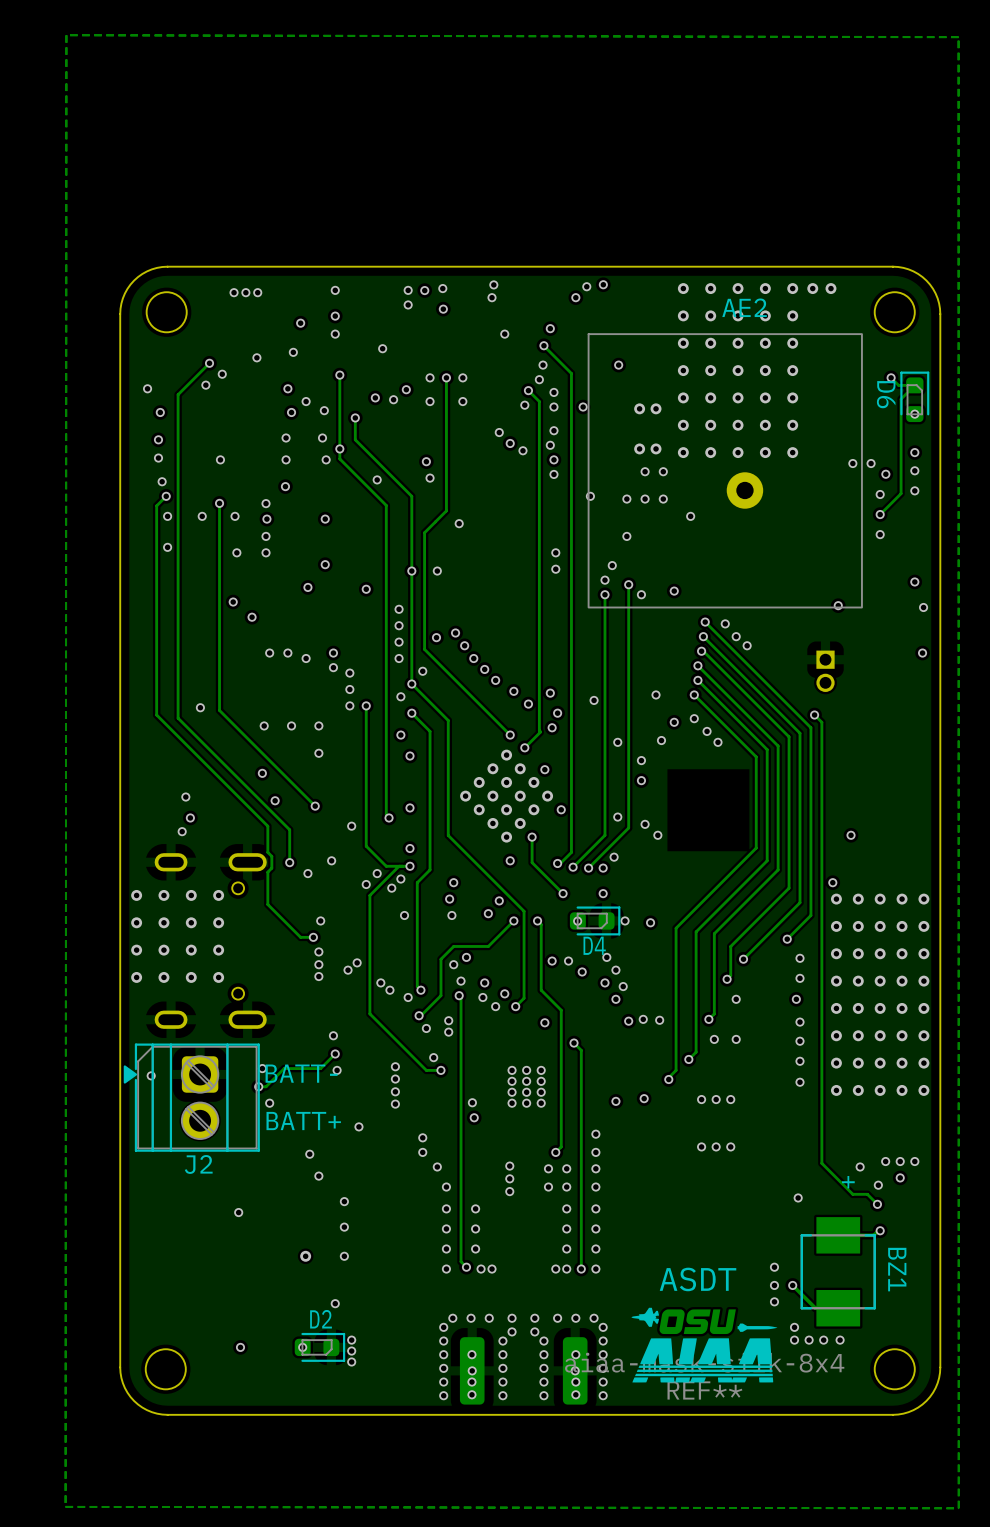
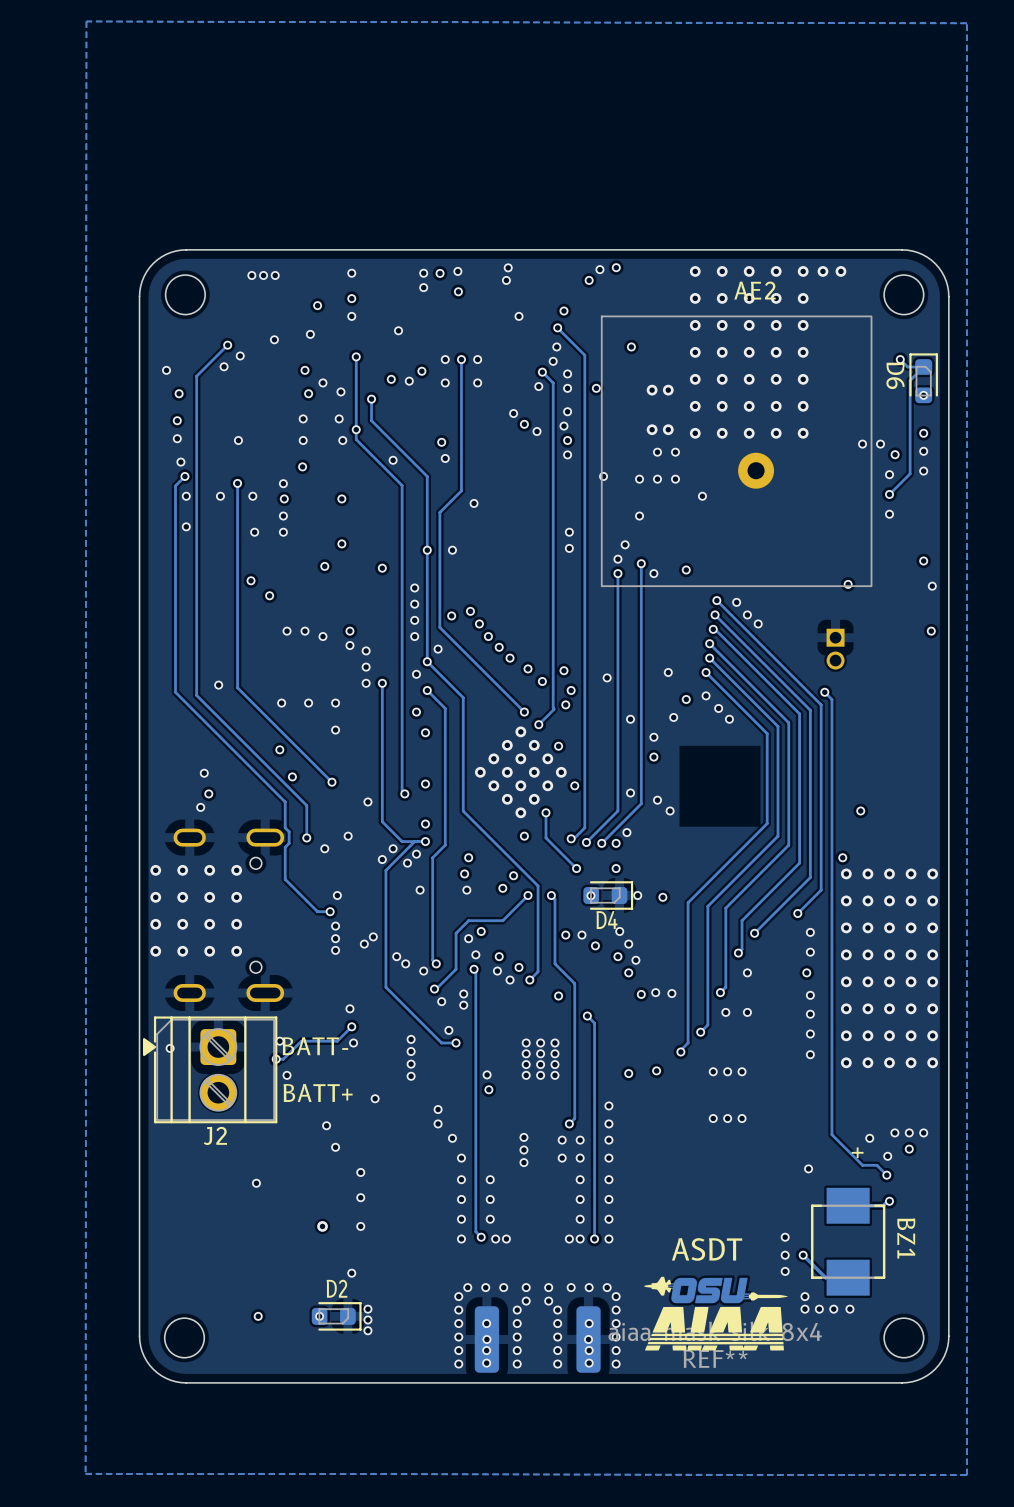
REF** footprint: [631, 1307, 778, 1383] -> [644, 1276, 788, 1351]

